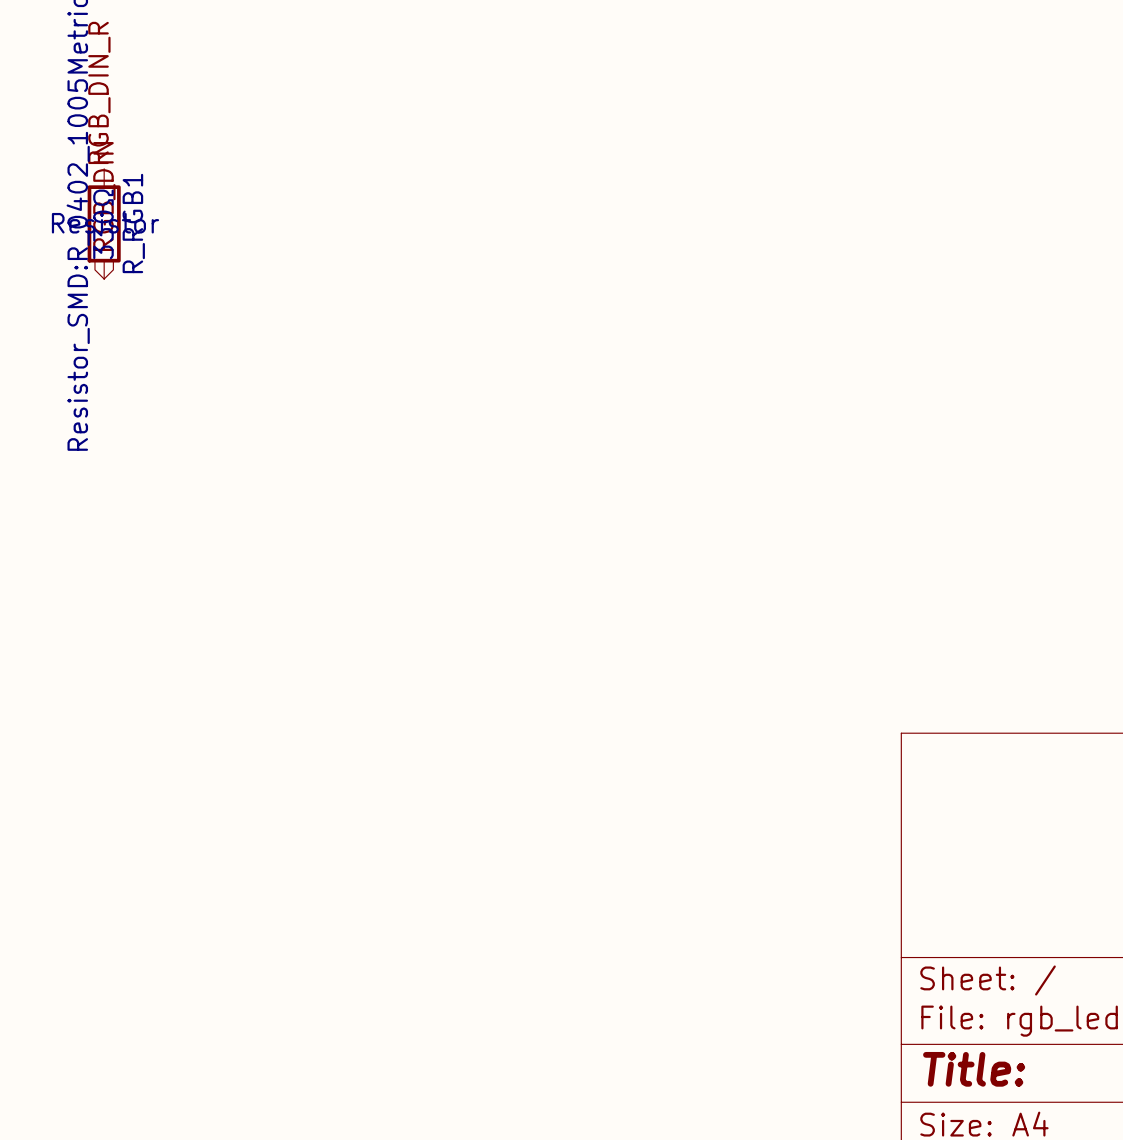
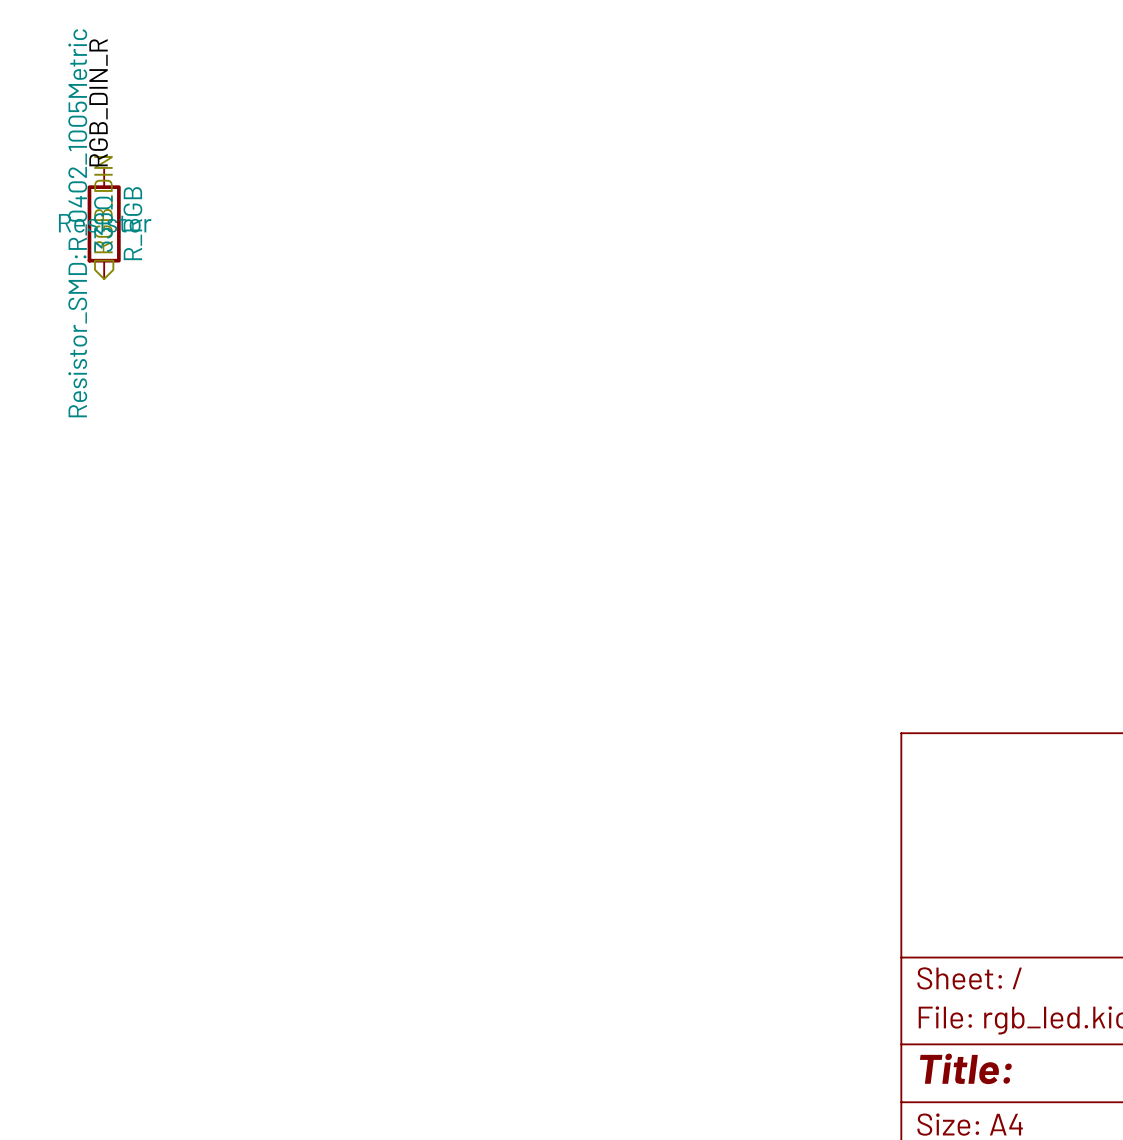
R_RGB1 name: R_RGB1 (133, 223) -> R_RGB (132, 223)

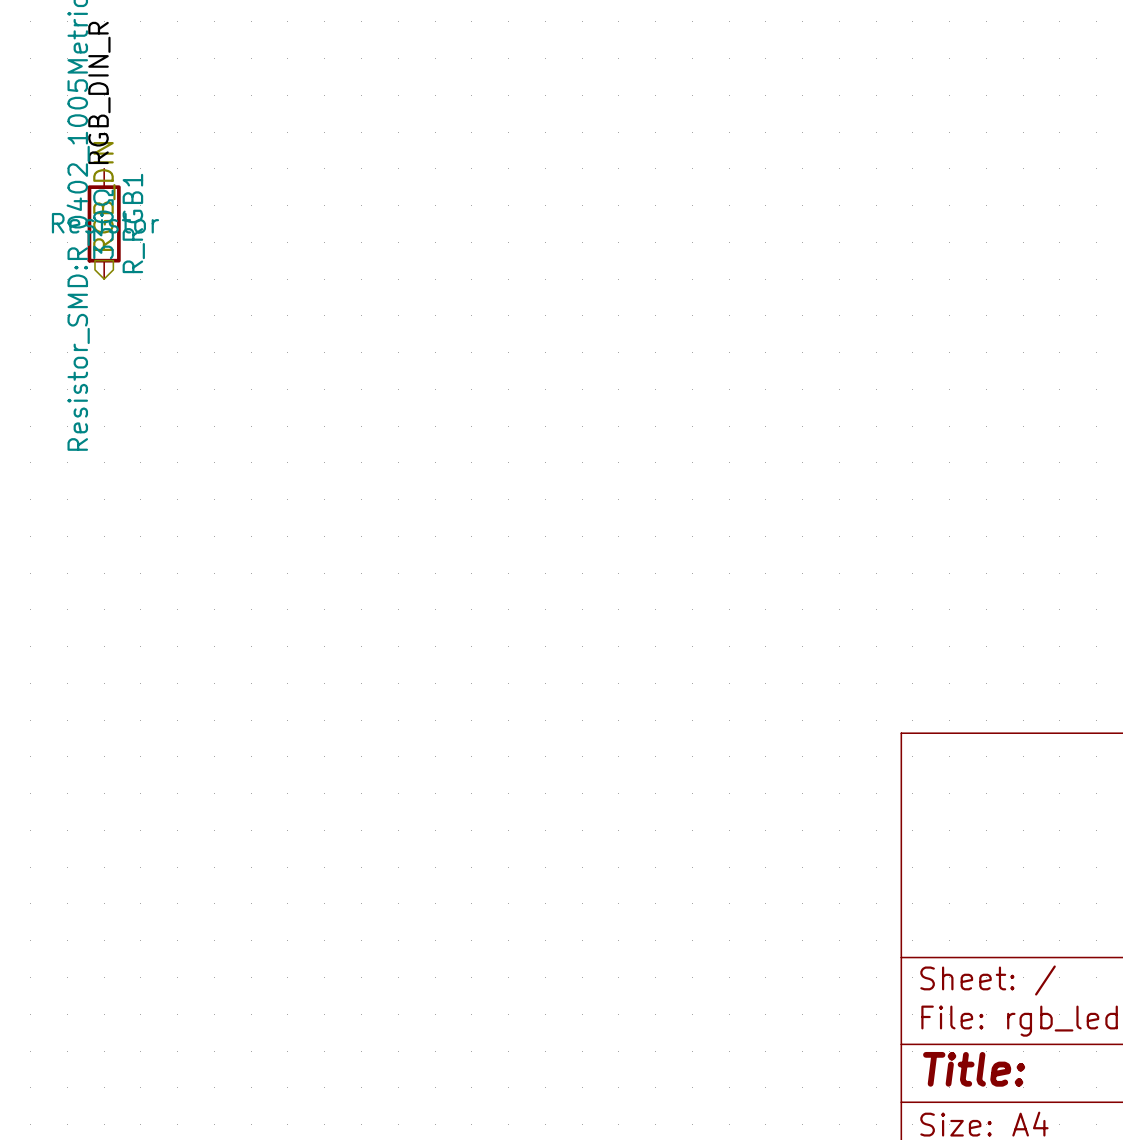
R_RGB name: R_RGB (132, 223) -> R_RGB1 (133, 223)

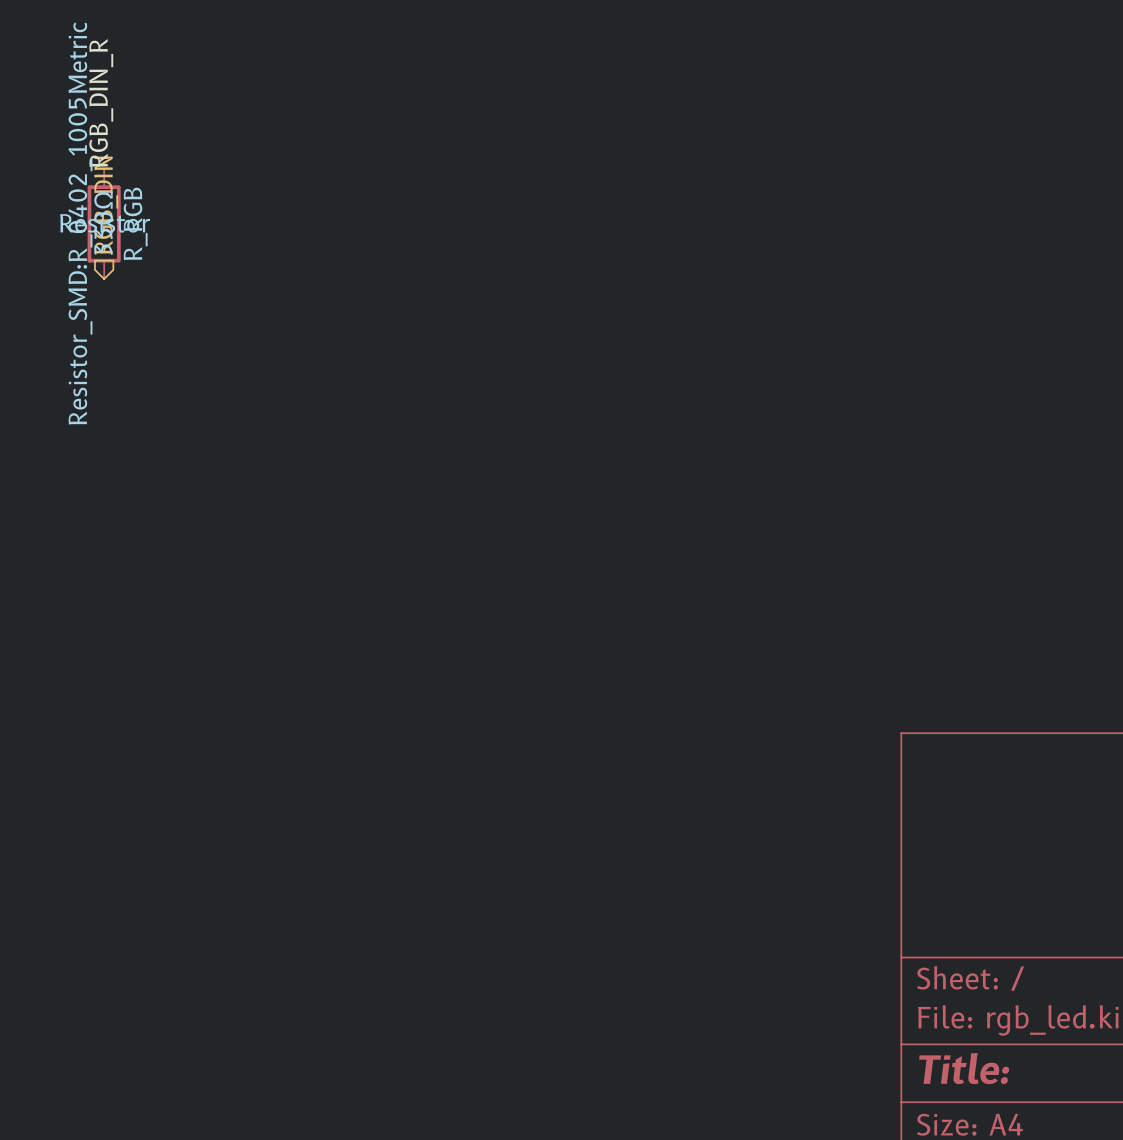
R_RGB1 name: R_RGB1 (133, 223) -> R_RGB (135, 223)

